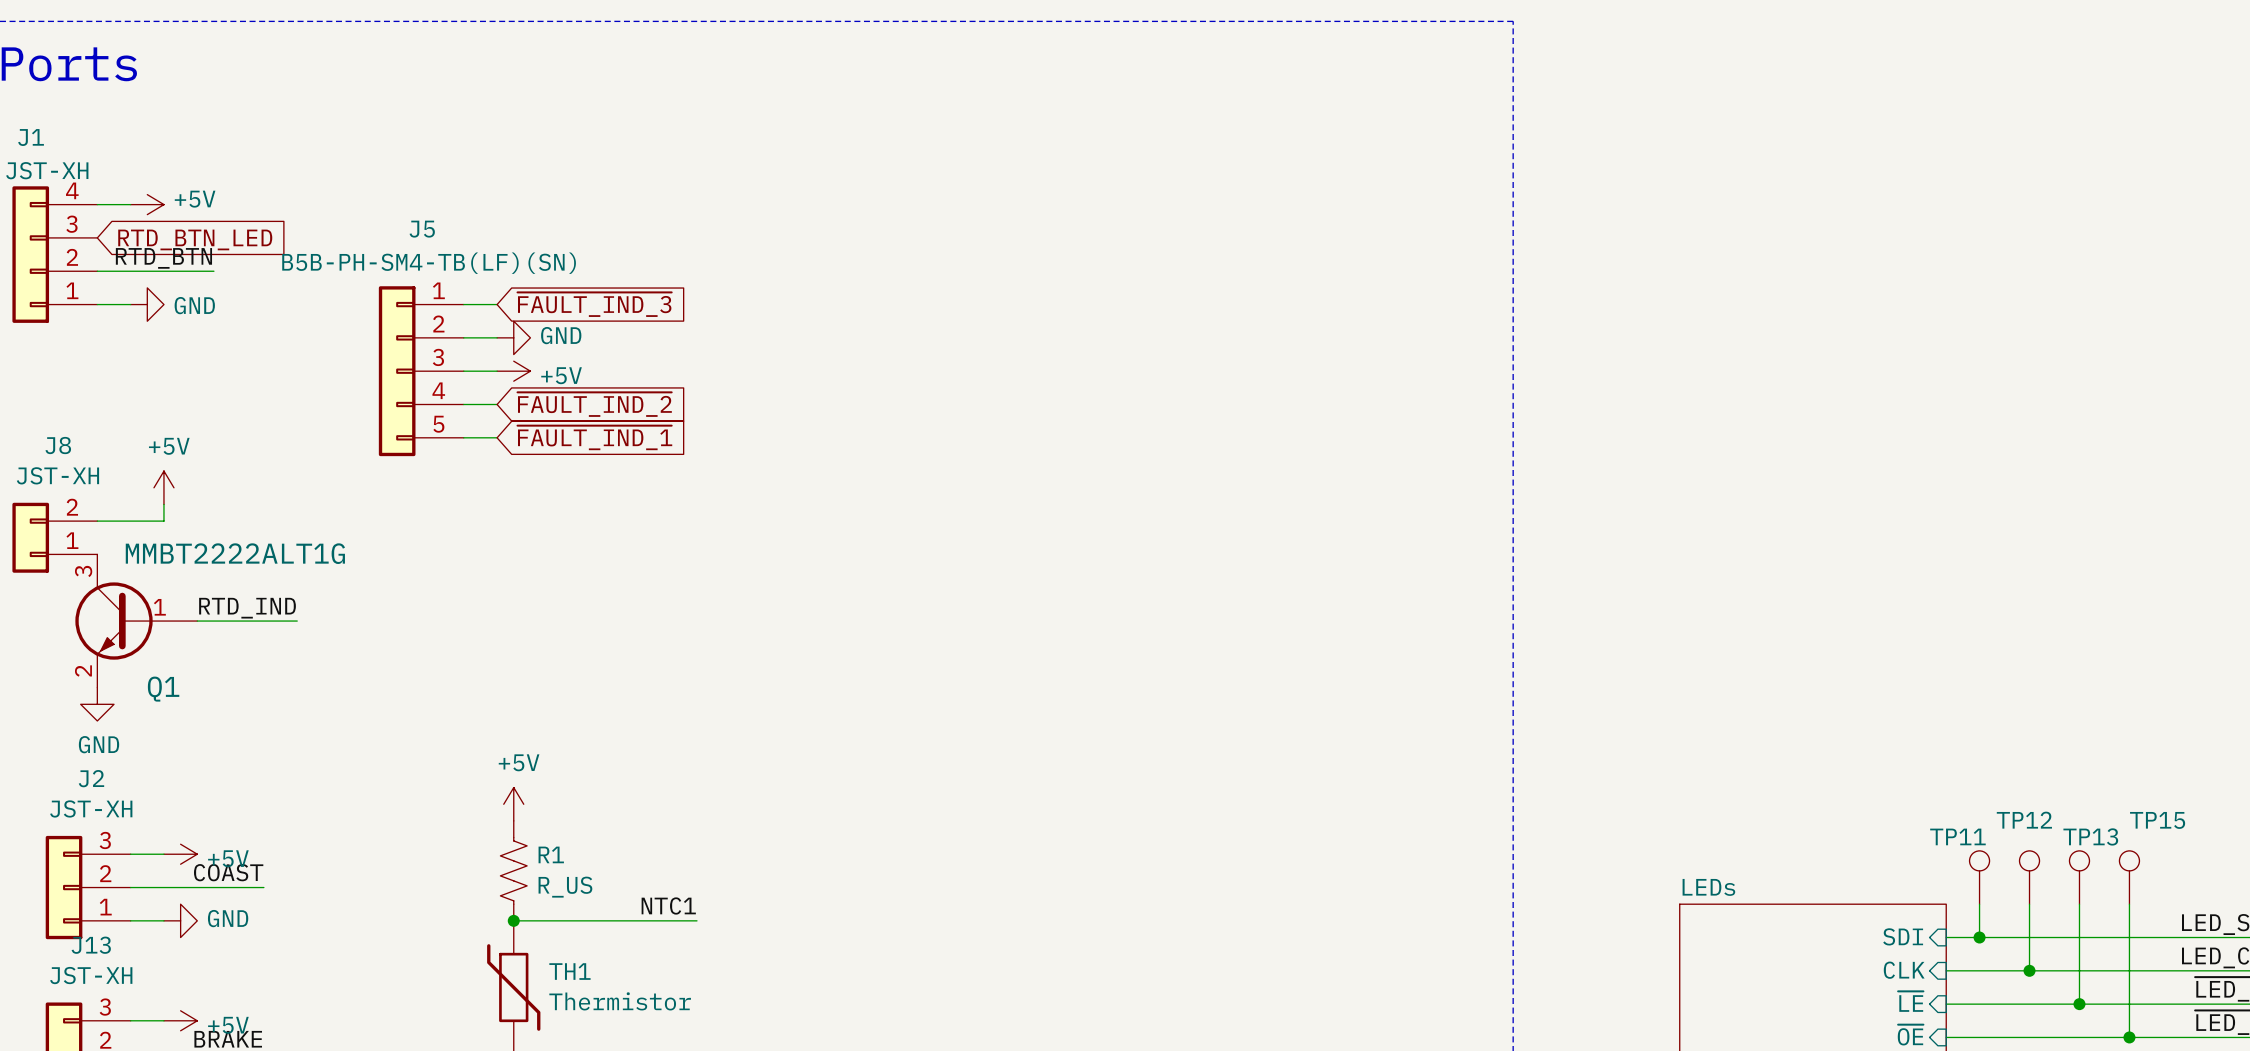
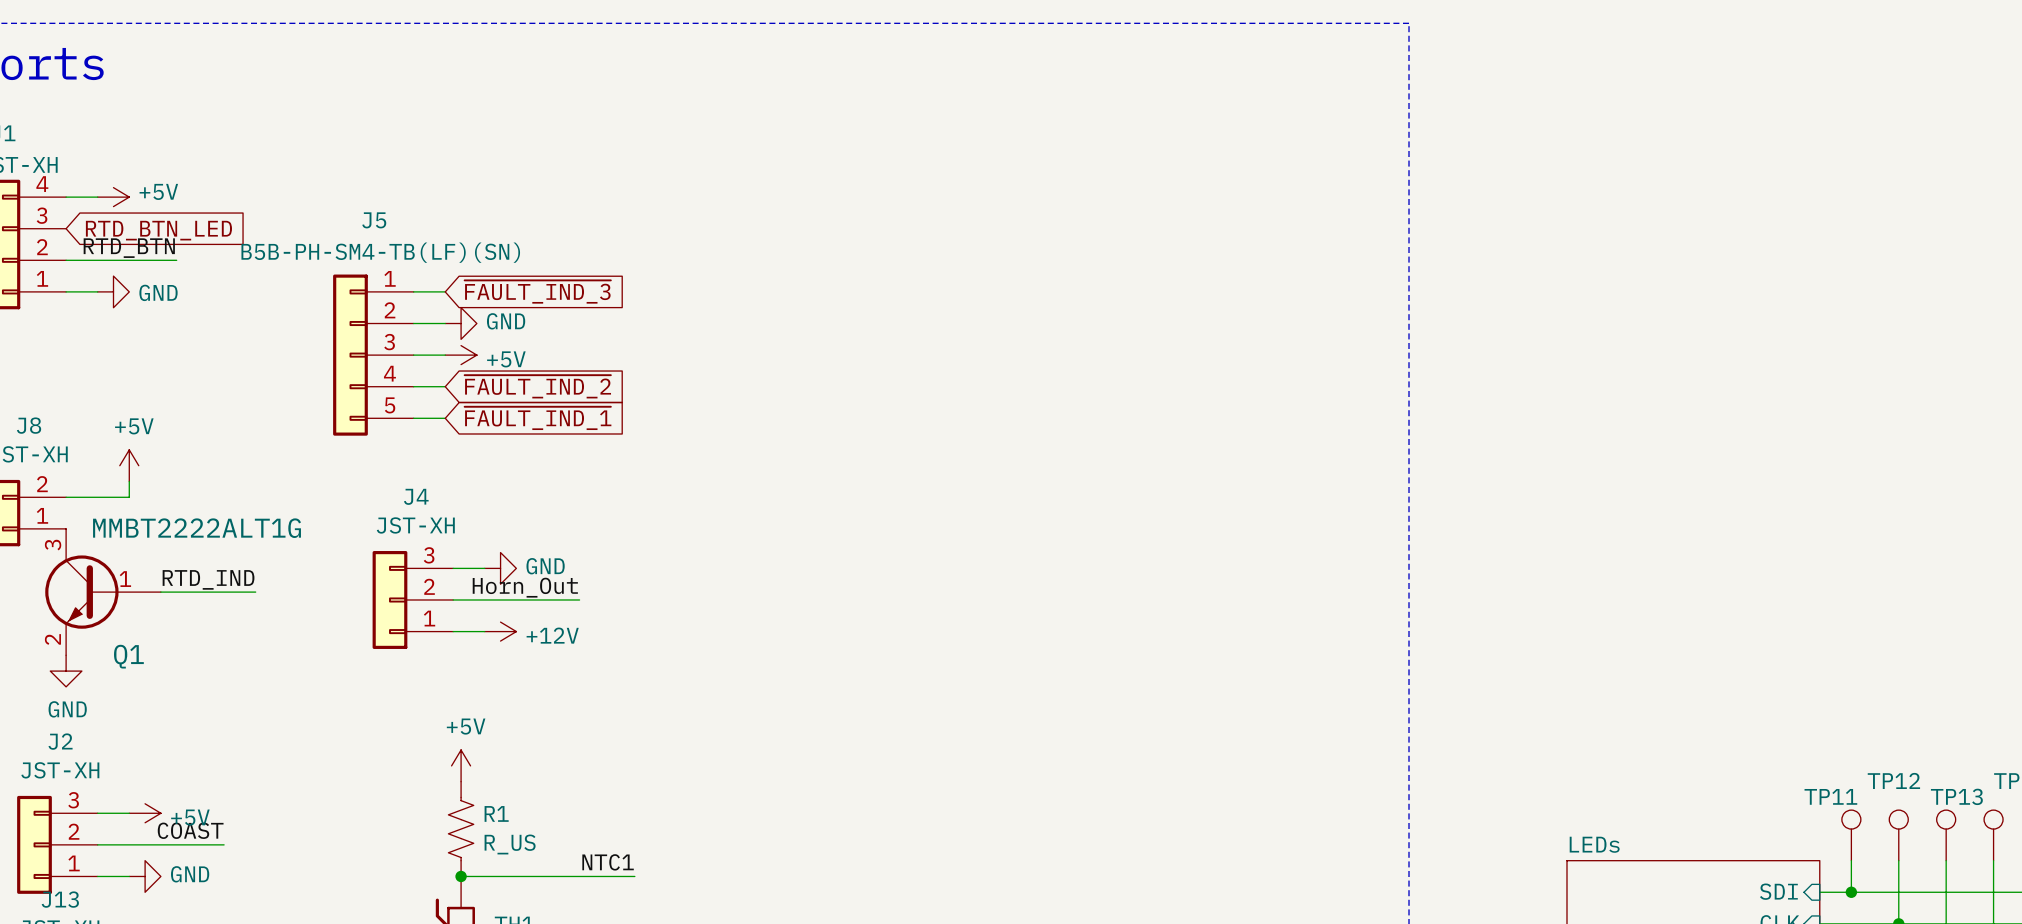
wire: none -> (453, 568) (484, 568)
power symbol: none -> GND (500, 568)
label: none -> Horn_Out (525, 587)
J4: none -> JST-XH (412, 599)
wire: none -> (453, 599) (579, 599)
wire: none -> (453, 631) (484, 631)
power symbol: none -> +12V (500, 631)

